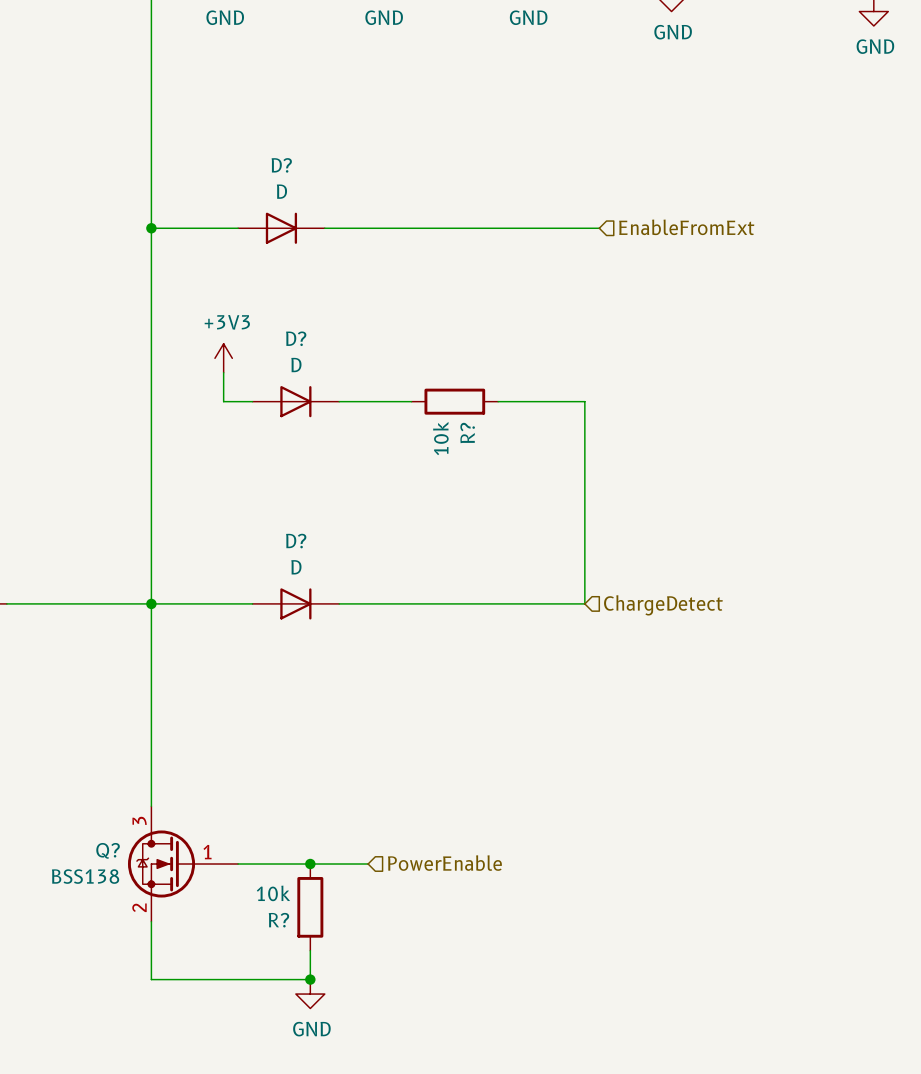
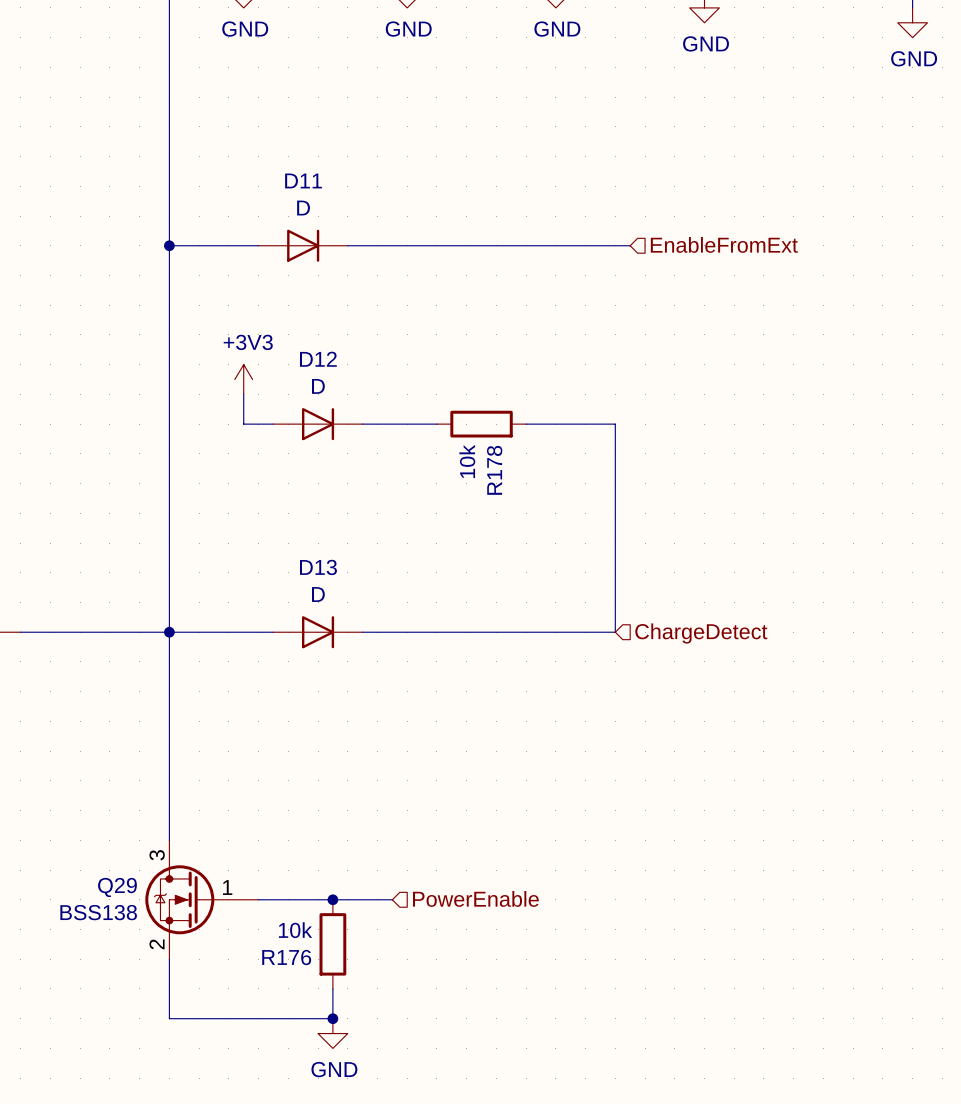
D? name: D? (281, 165) -> D11 (303, 180)
D? name: D? (296, 338) -> D12 (318, 359)
R? name: R? (467, 433) -> R178 (494, 470)
D? name: D? (296, 541) -> D13 (318, 567)
Q? name: Q? (108, 850) -> Q29 (117, 887)
R? name: R? (278, 920) -> R176 (286, 957)

